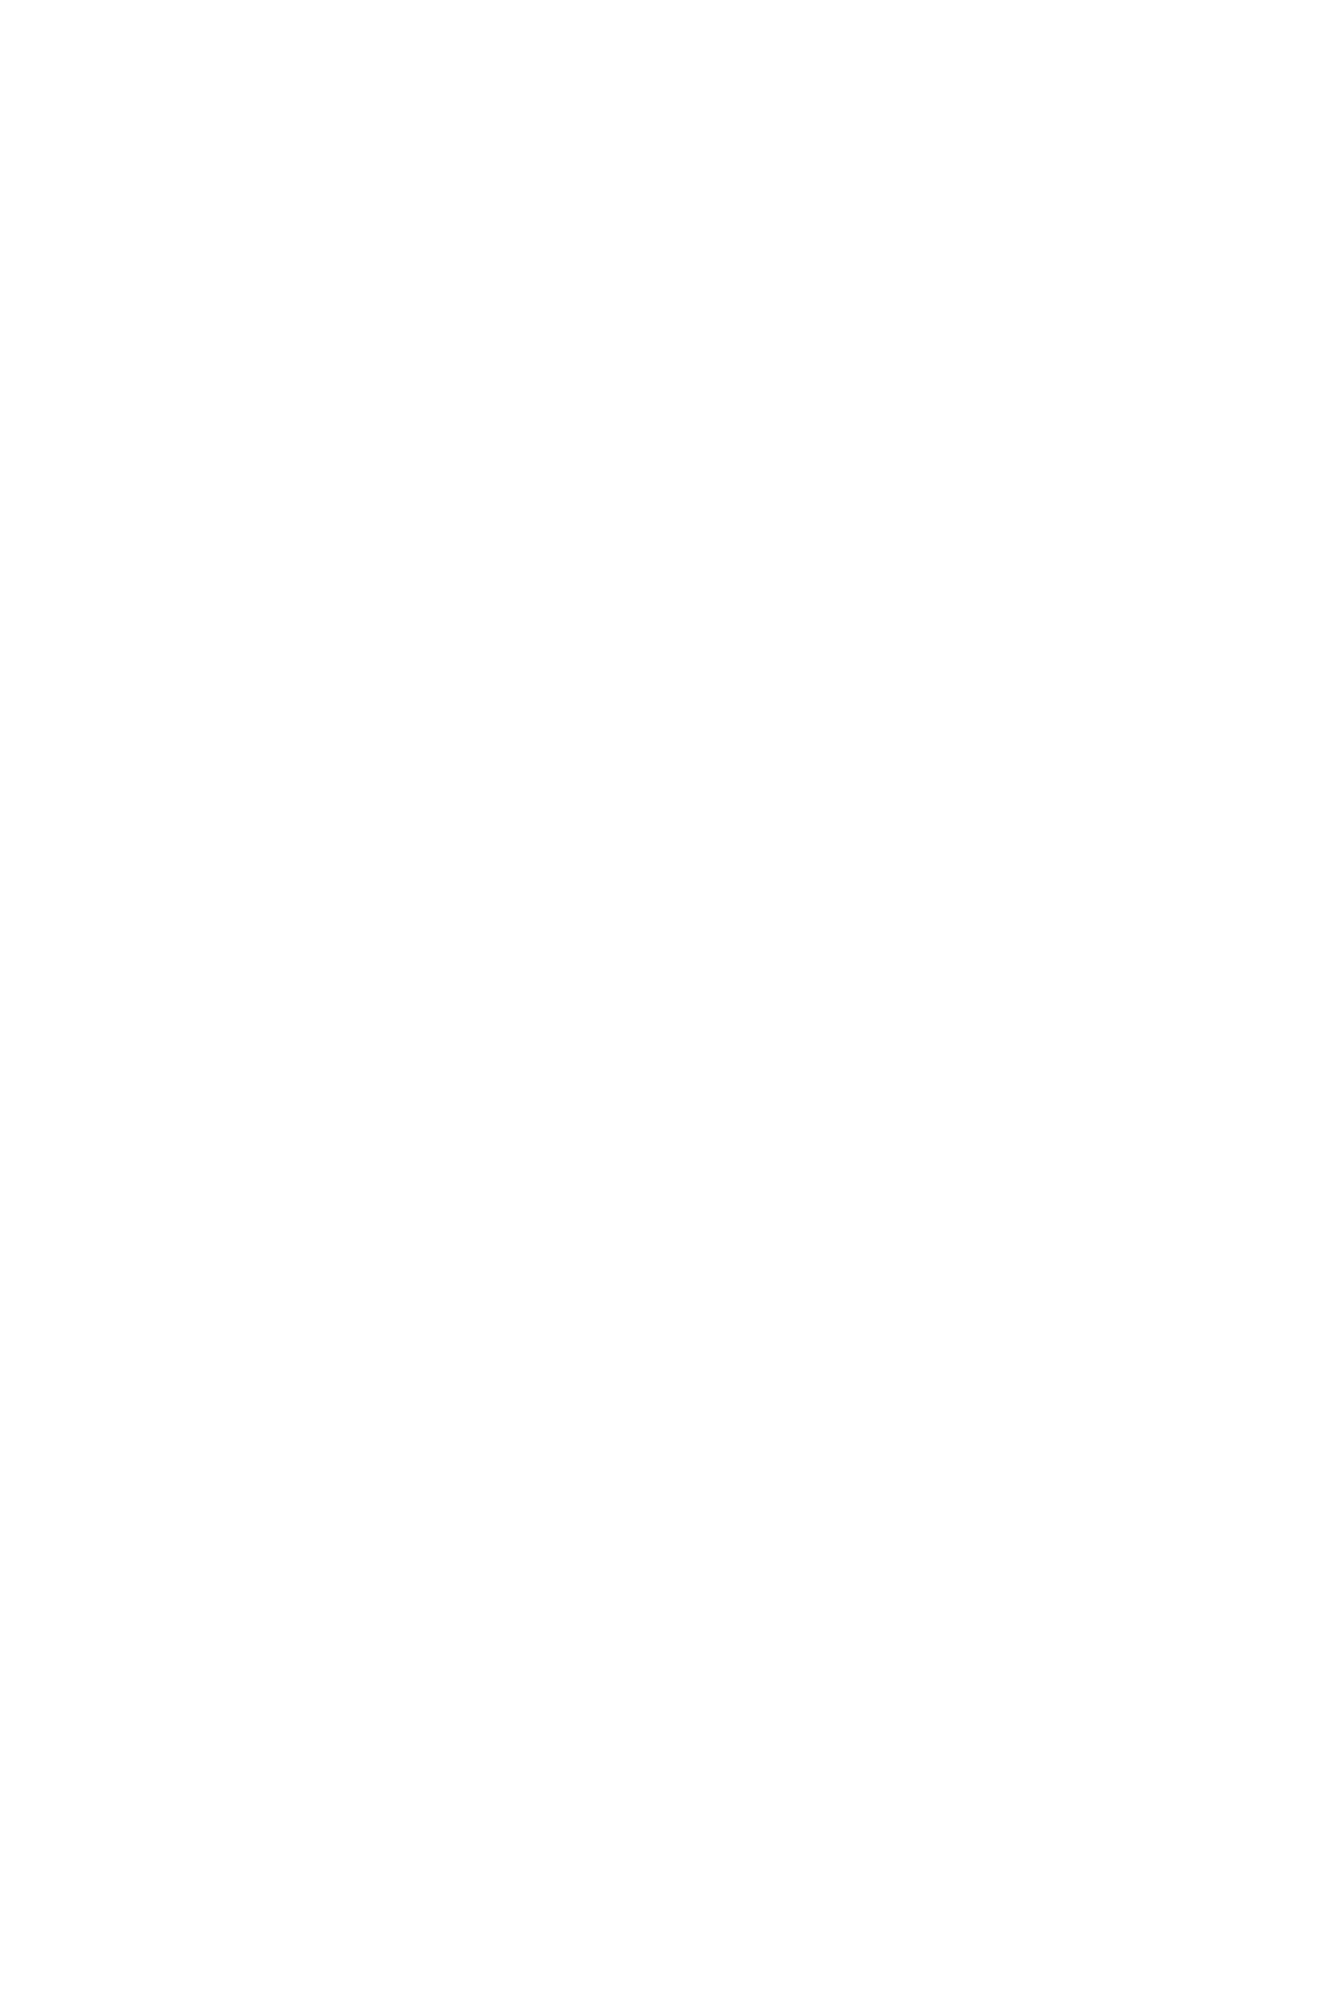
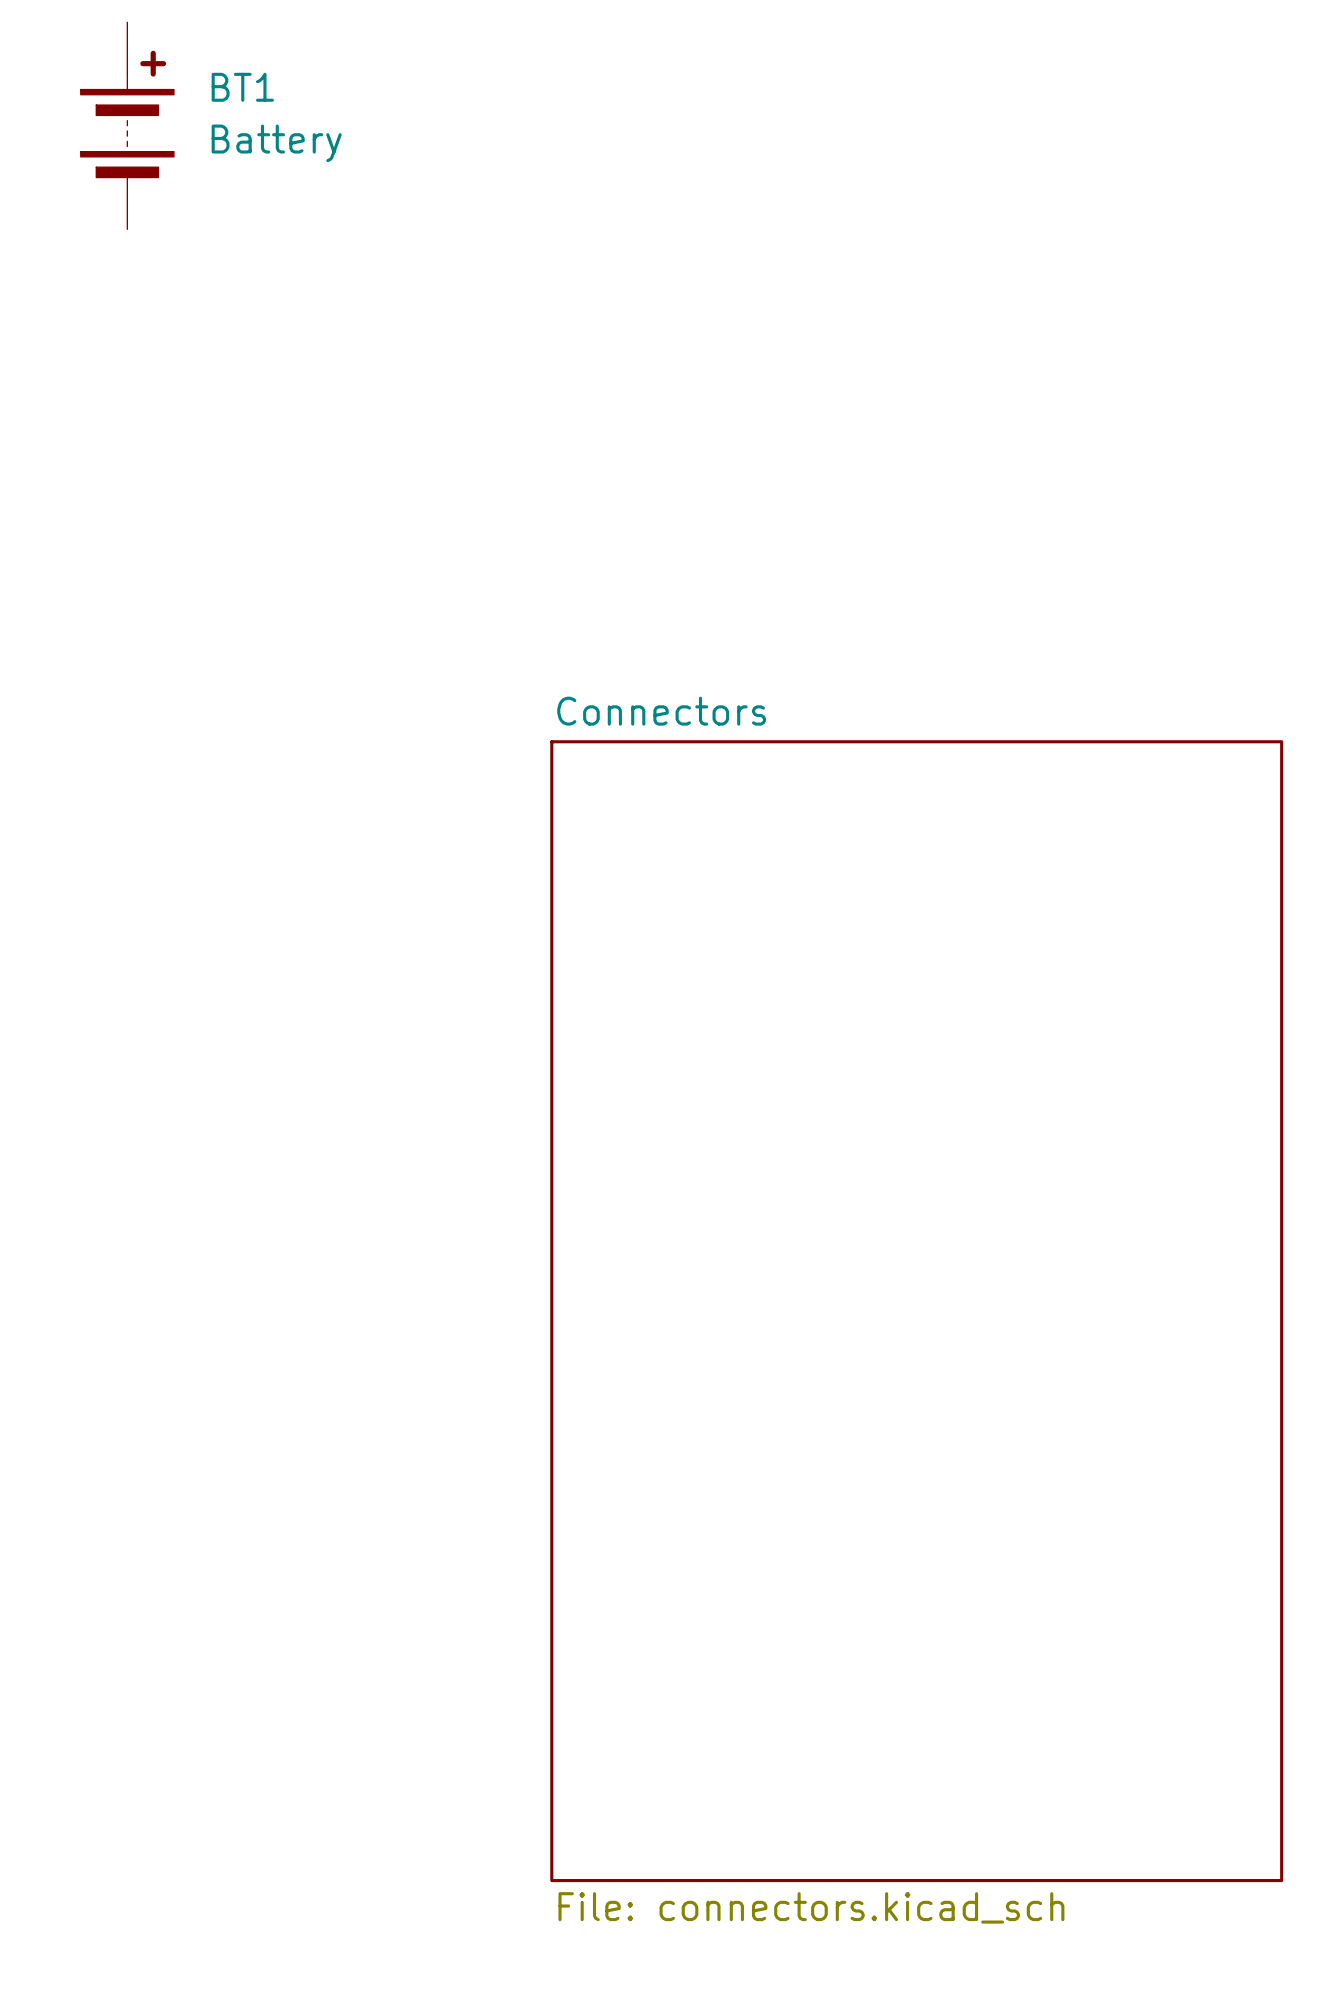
BT1: none -> Battery (127, 125)
sheet Connectors: none -> File: connectors.kicad_sch (916, 1311)

